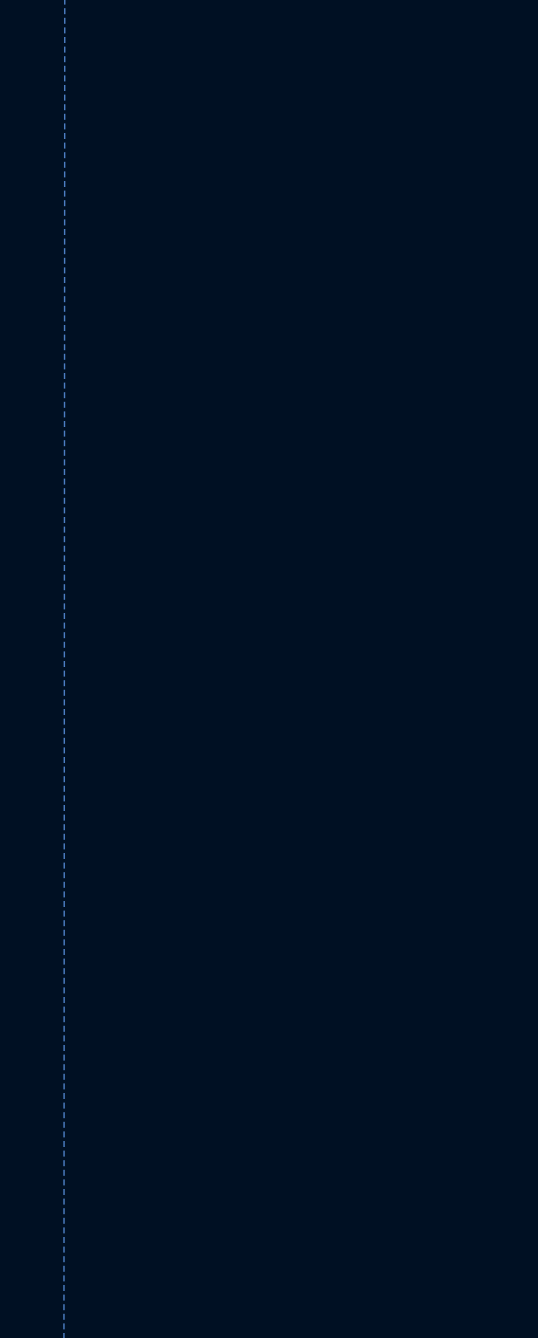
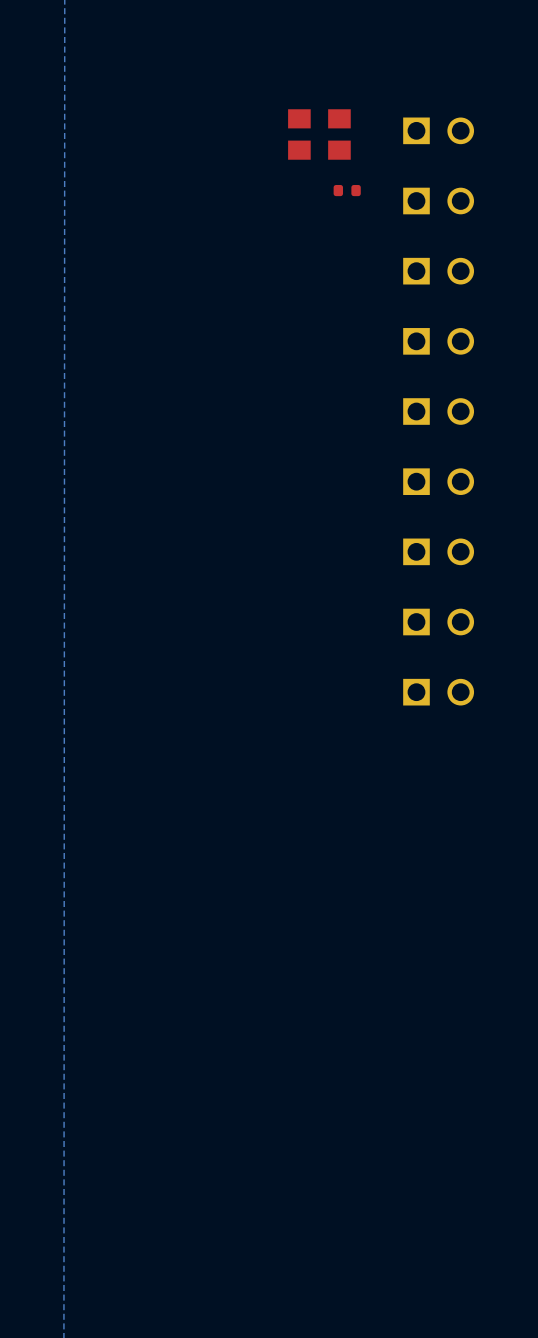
part: none -> (438, 130)
part: none -> (319, 134)
part: none -> (347, 190)
part: none -> (438, 201)
part: none -> (438, 271)
part: none -> (438, 341)
part: none -> (438, 411)
part: none -> (438, 481)
part: none -> (438, 551)
part: none -> (438, 622)
part: none -> (438, 692)

